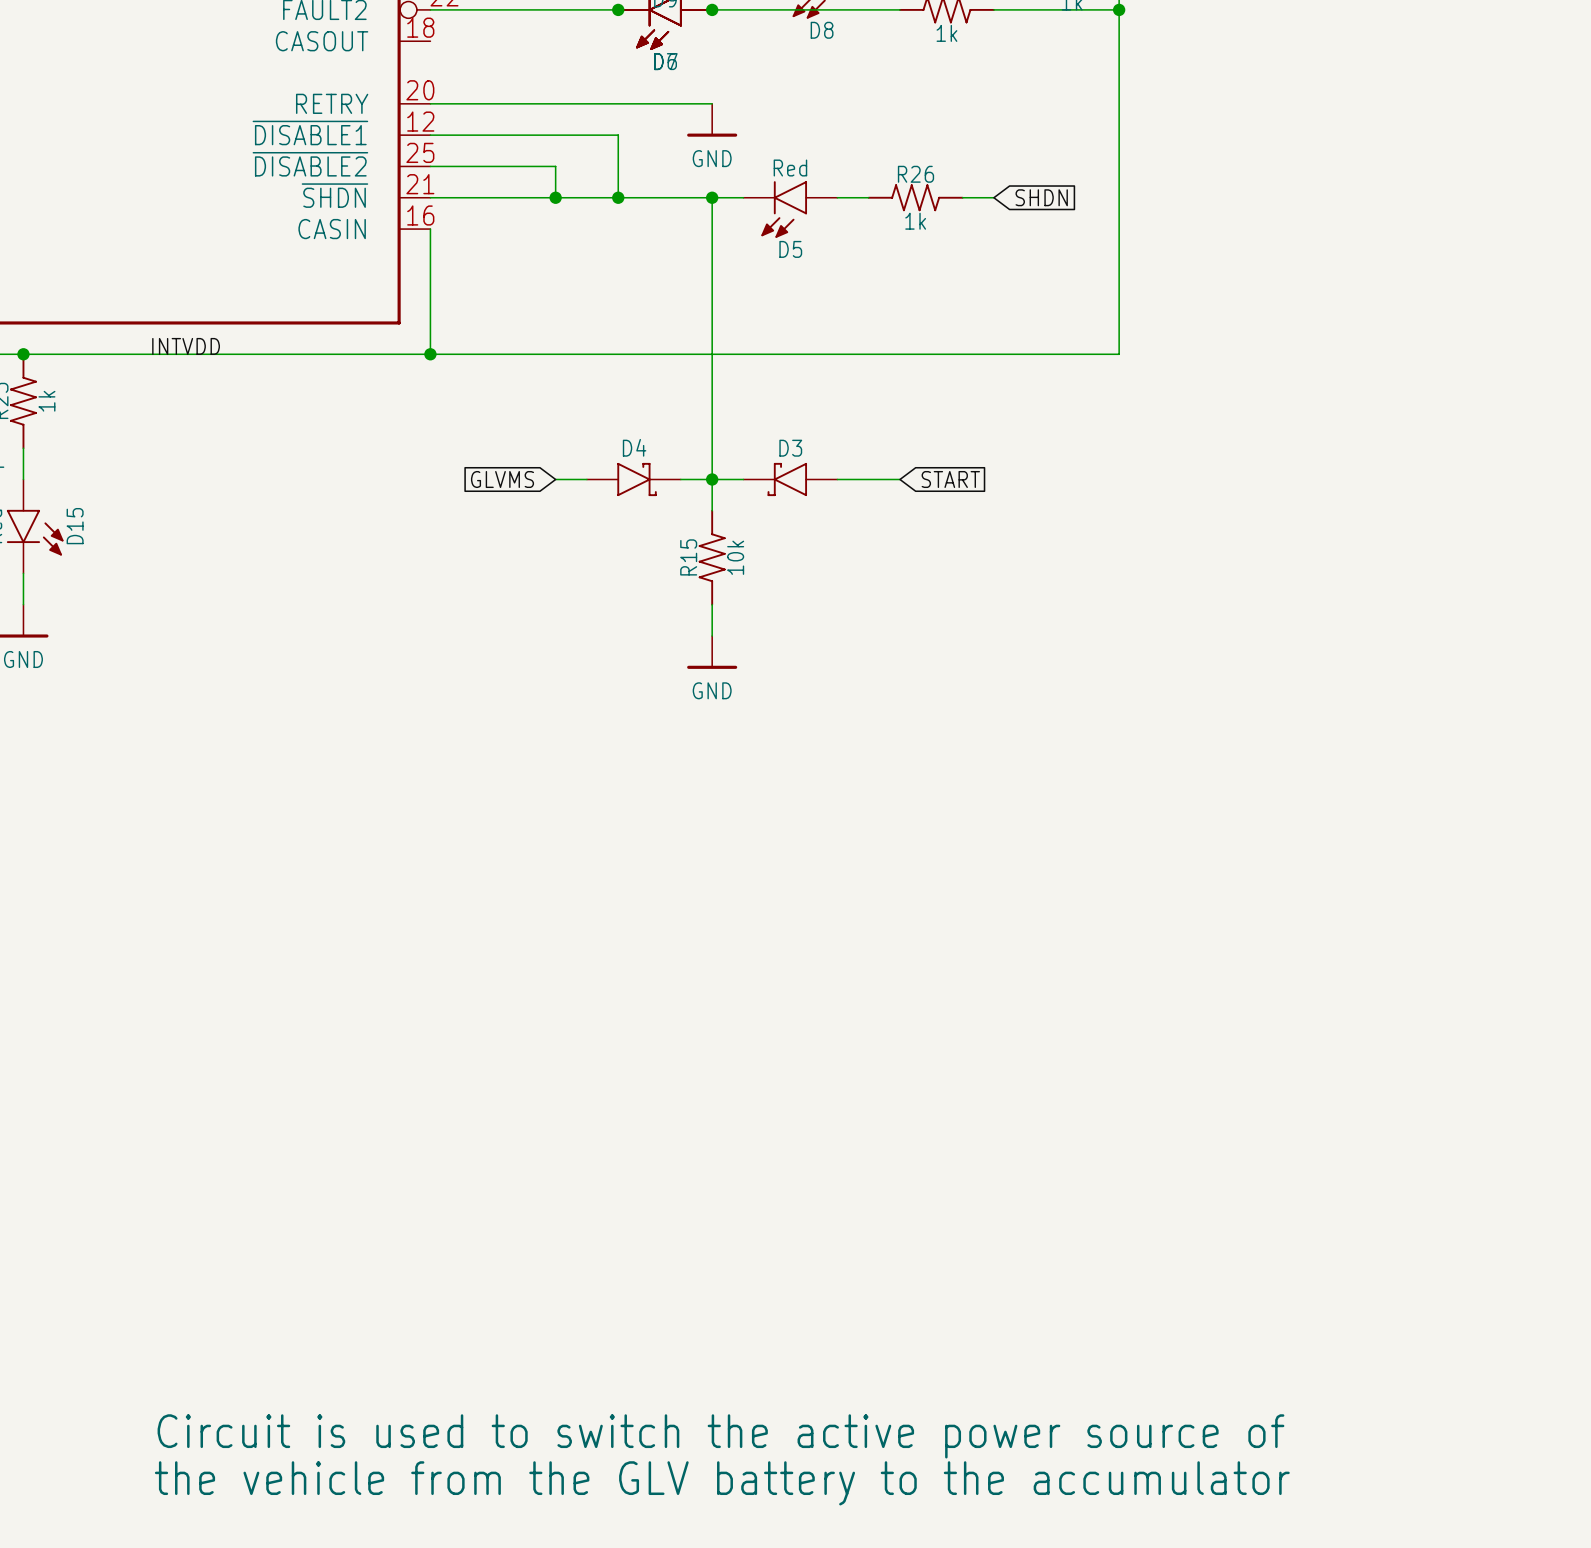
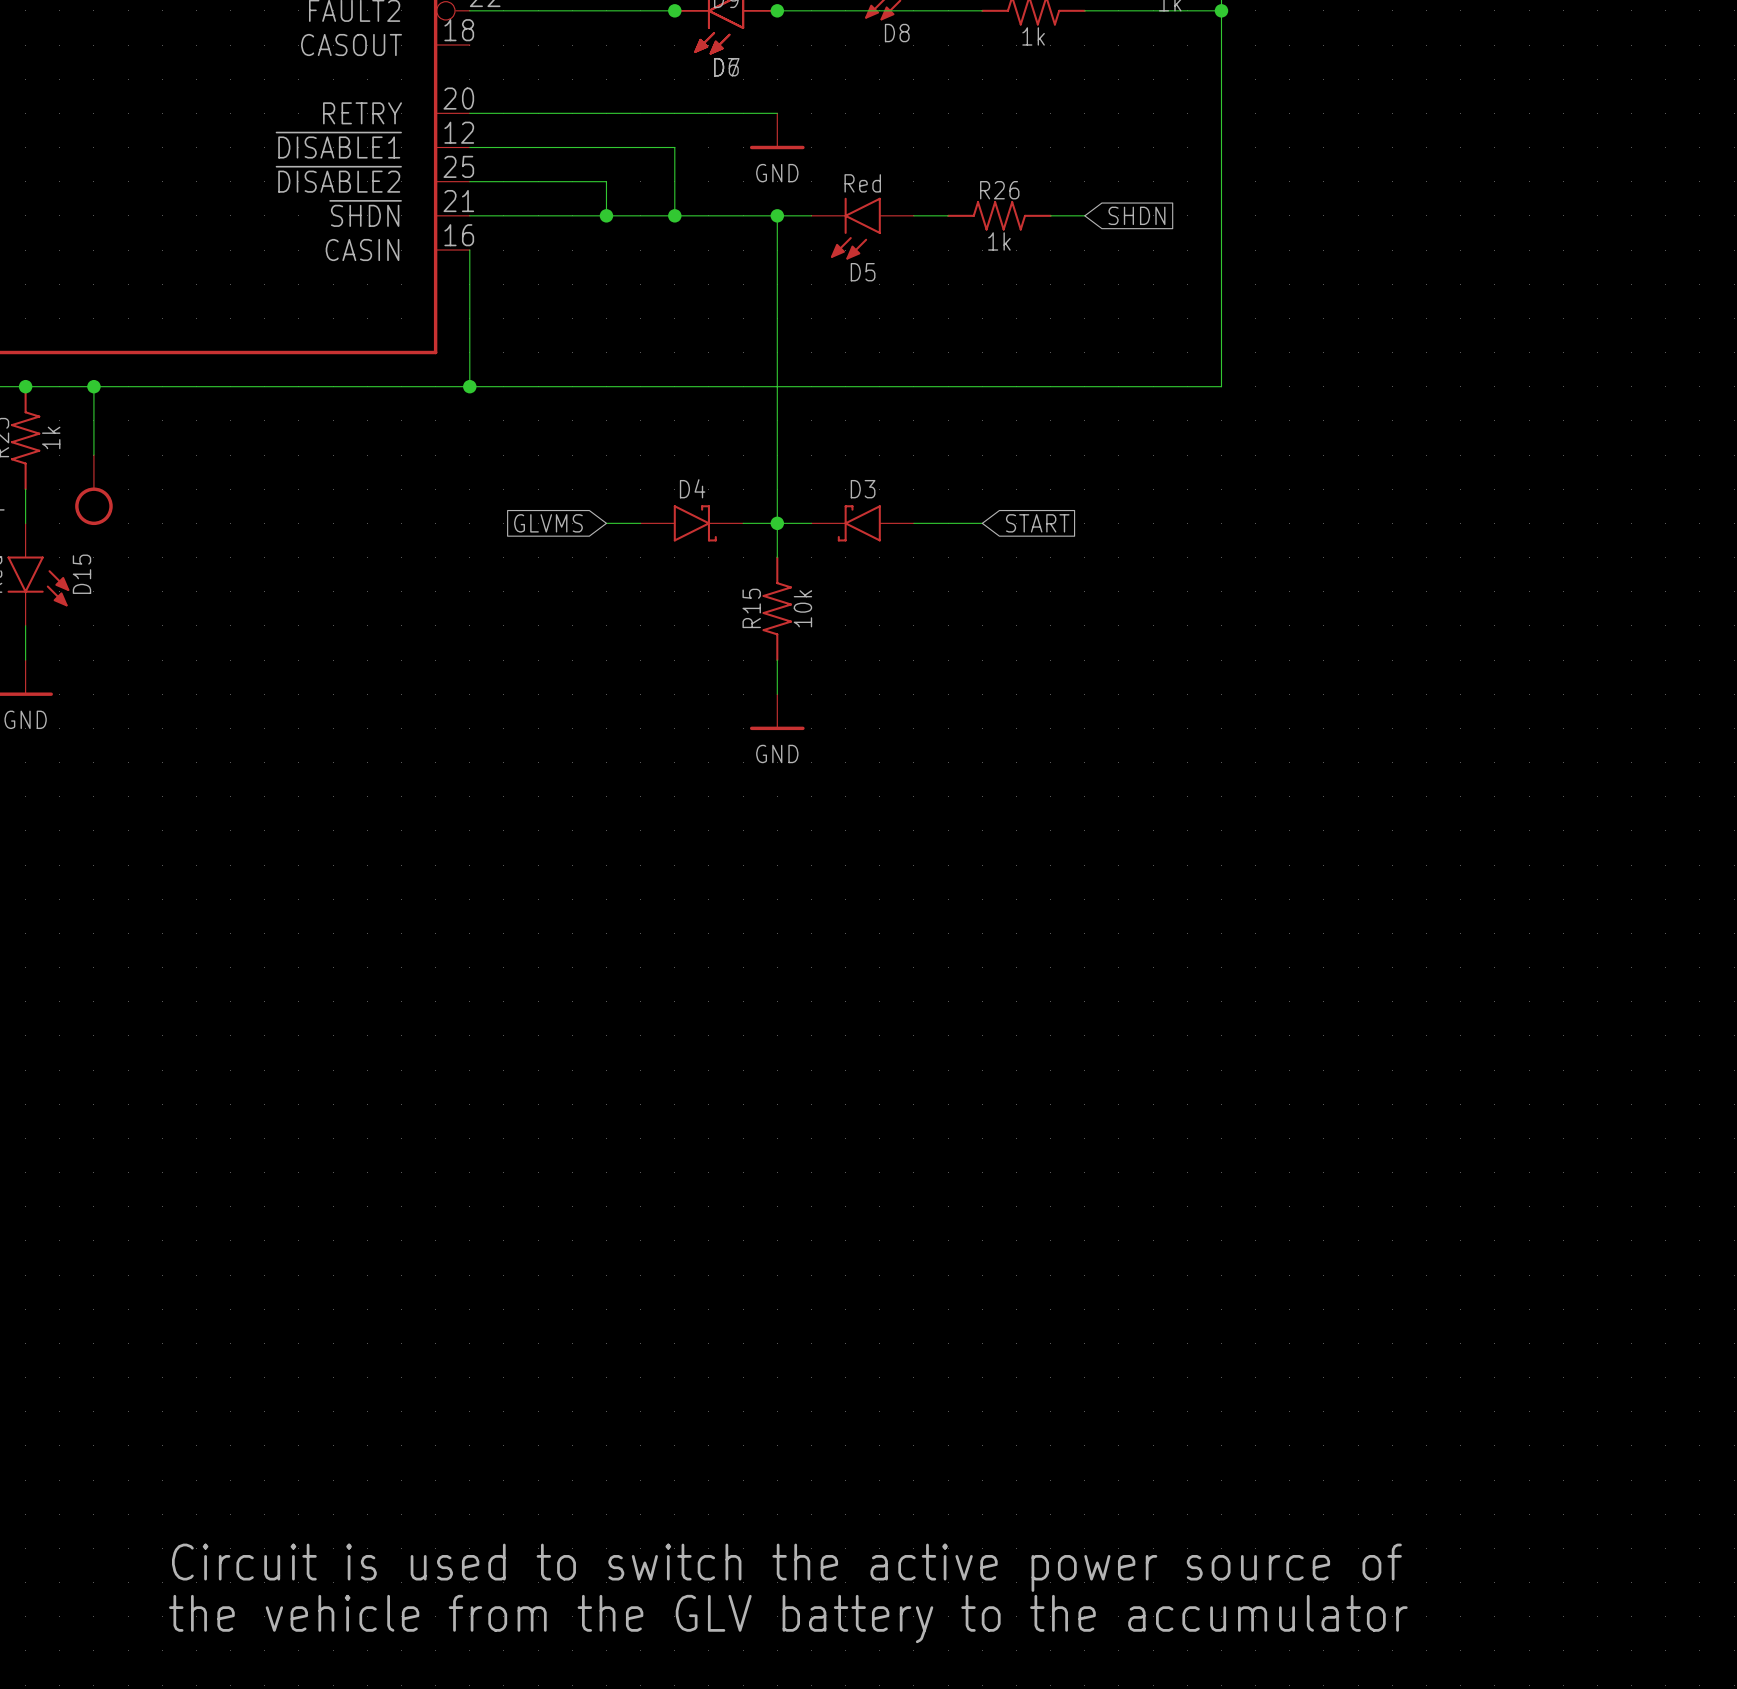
label: INTVDD (186, 346) -> none
wire: none -> (93, 386) (93, 455)
junction: none -> (93, 386)
part: none -> (93, 490)

